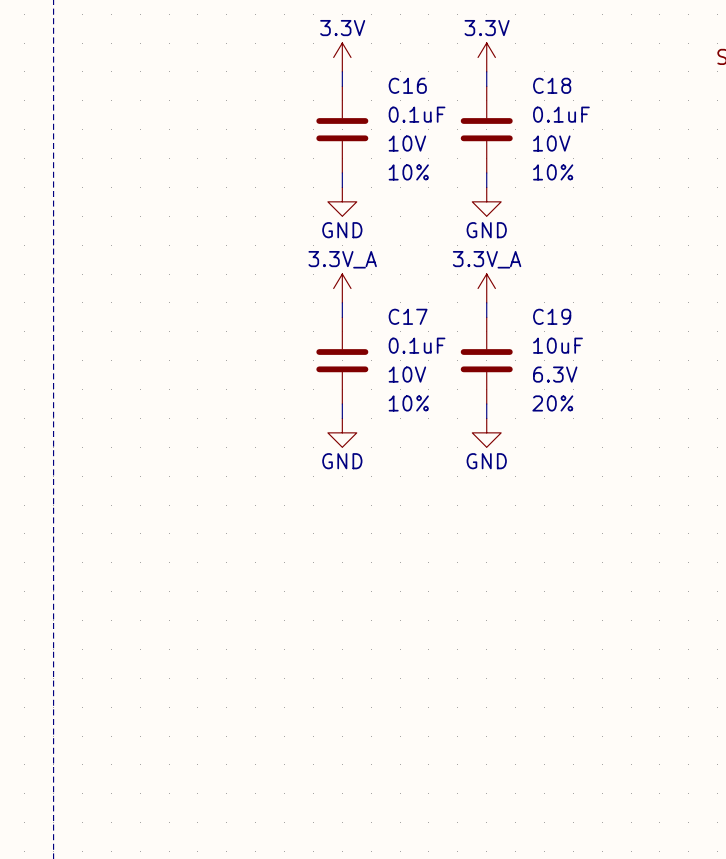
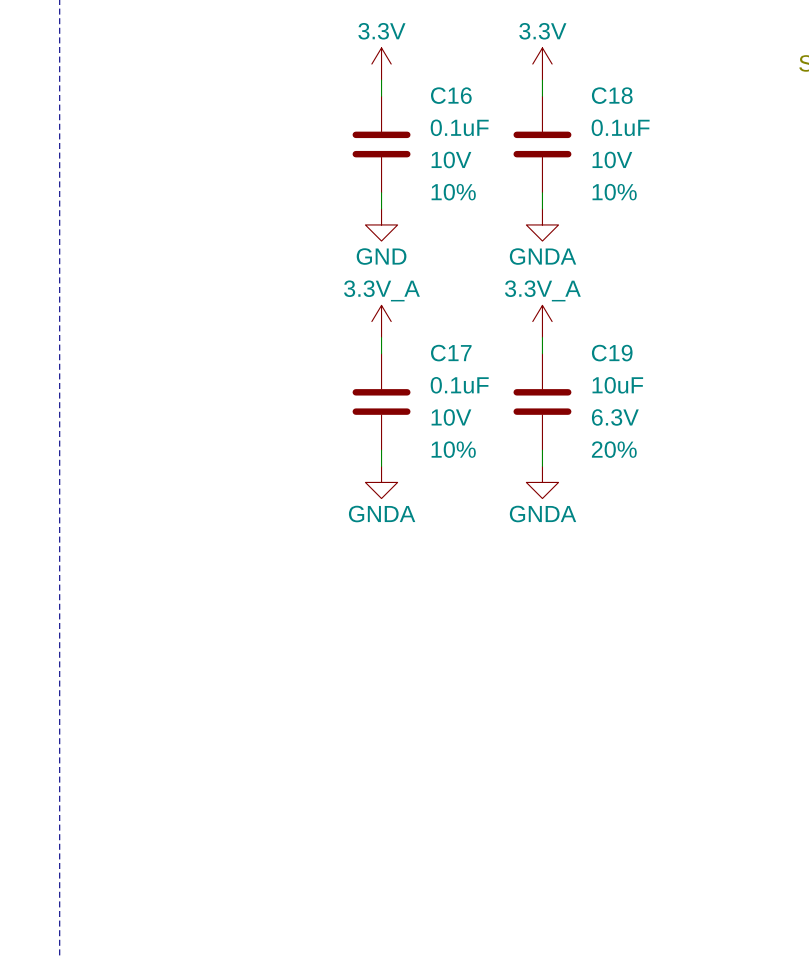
power symbol: GND (486, 201) -> GNDA (542, 224)
power symbol: GND (342, 432) -> GNDA (381, 482)
power symbol: GND (486, 432) -> GNDA (542, 482)

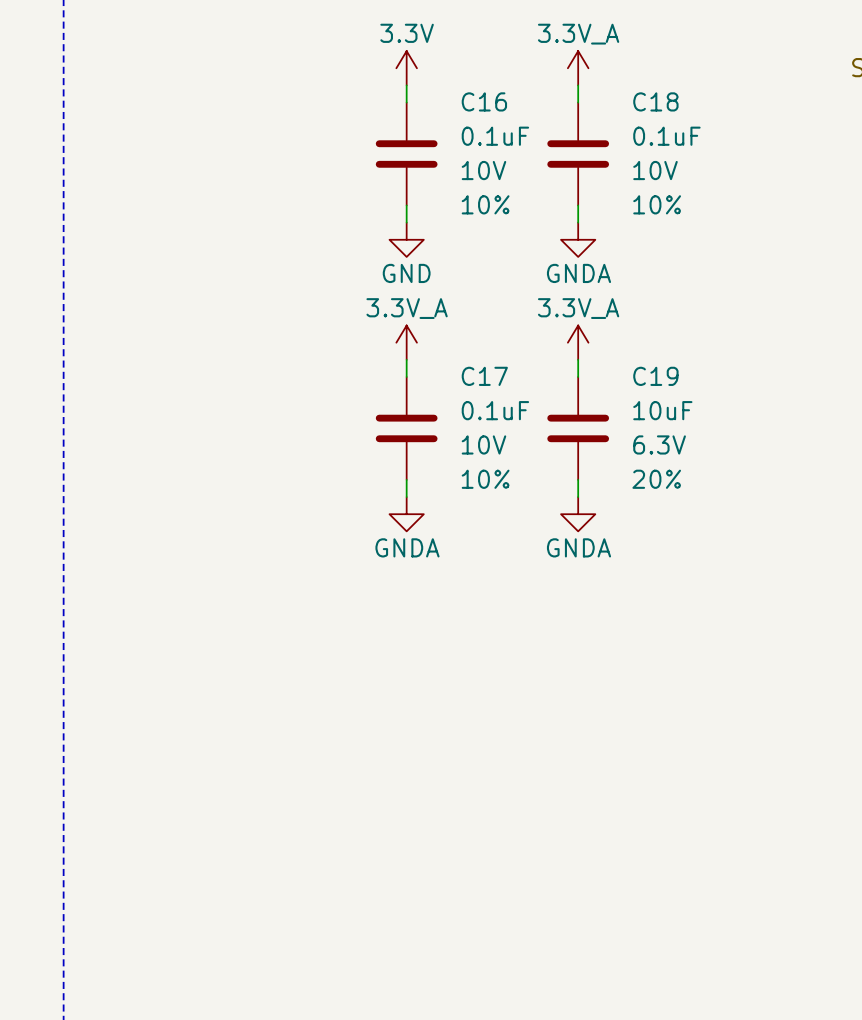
power symbol: 3.3V (542, 64) -> 3.3V_A (578, 68)

